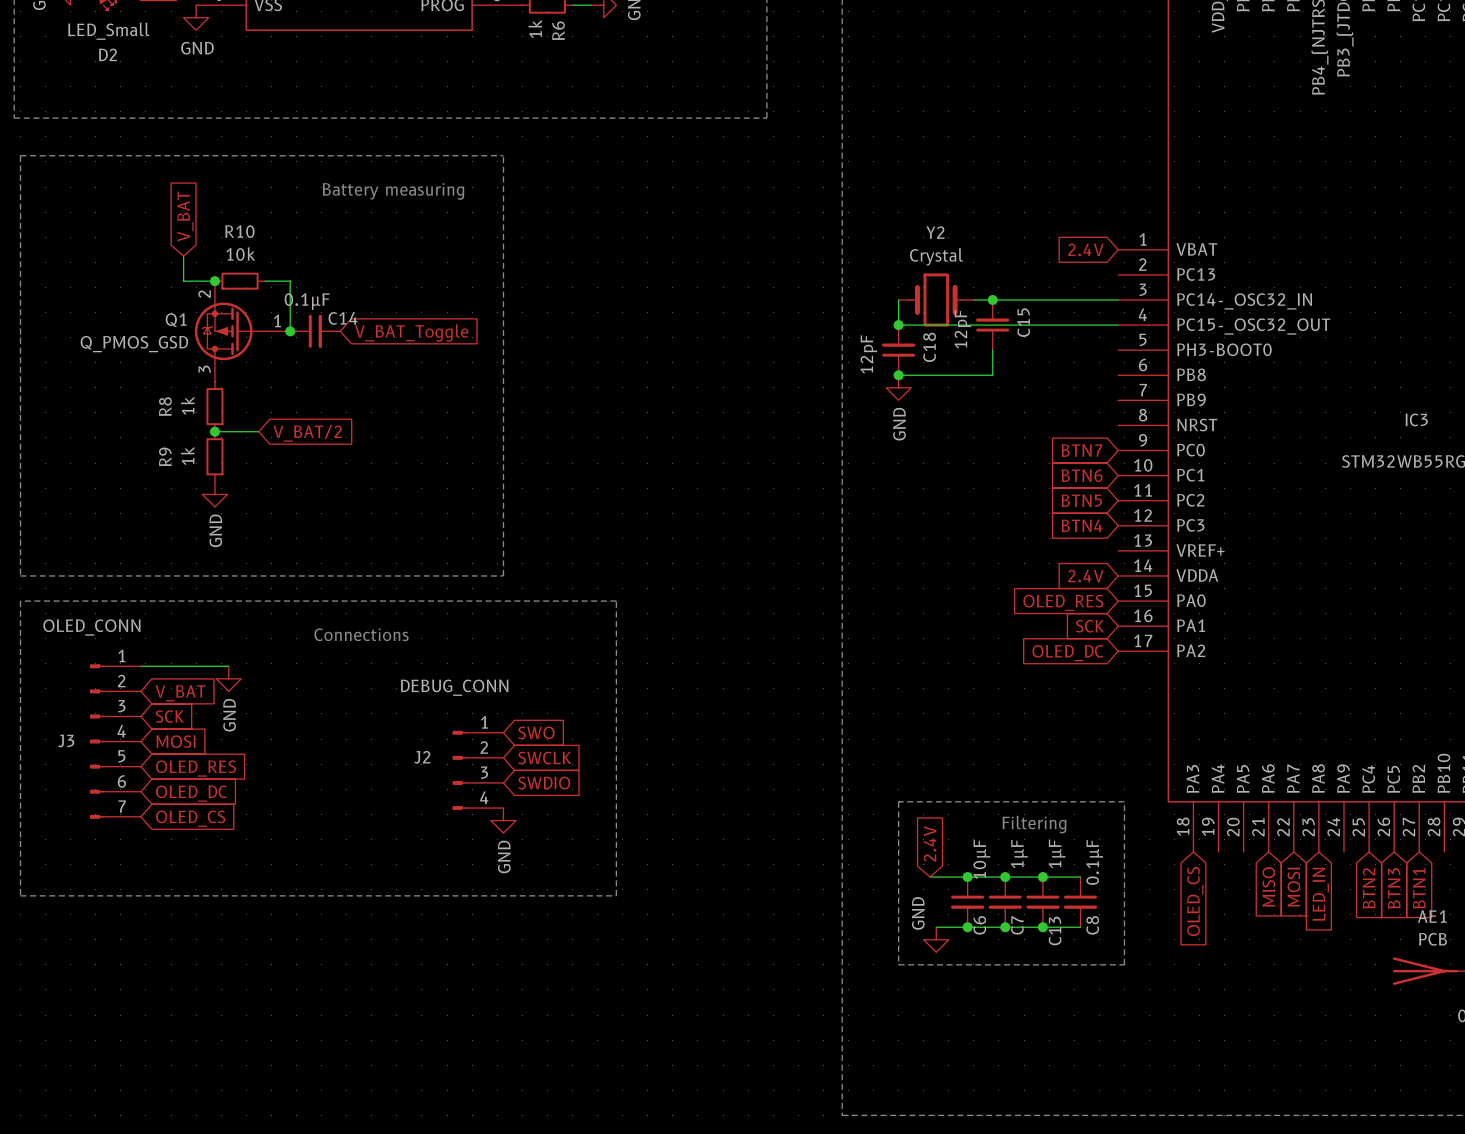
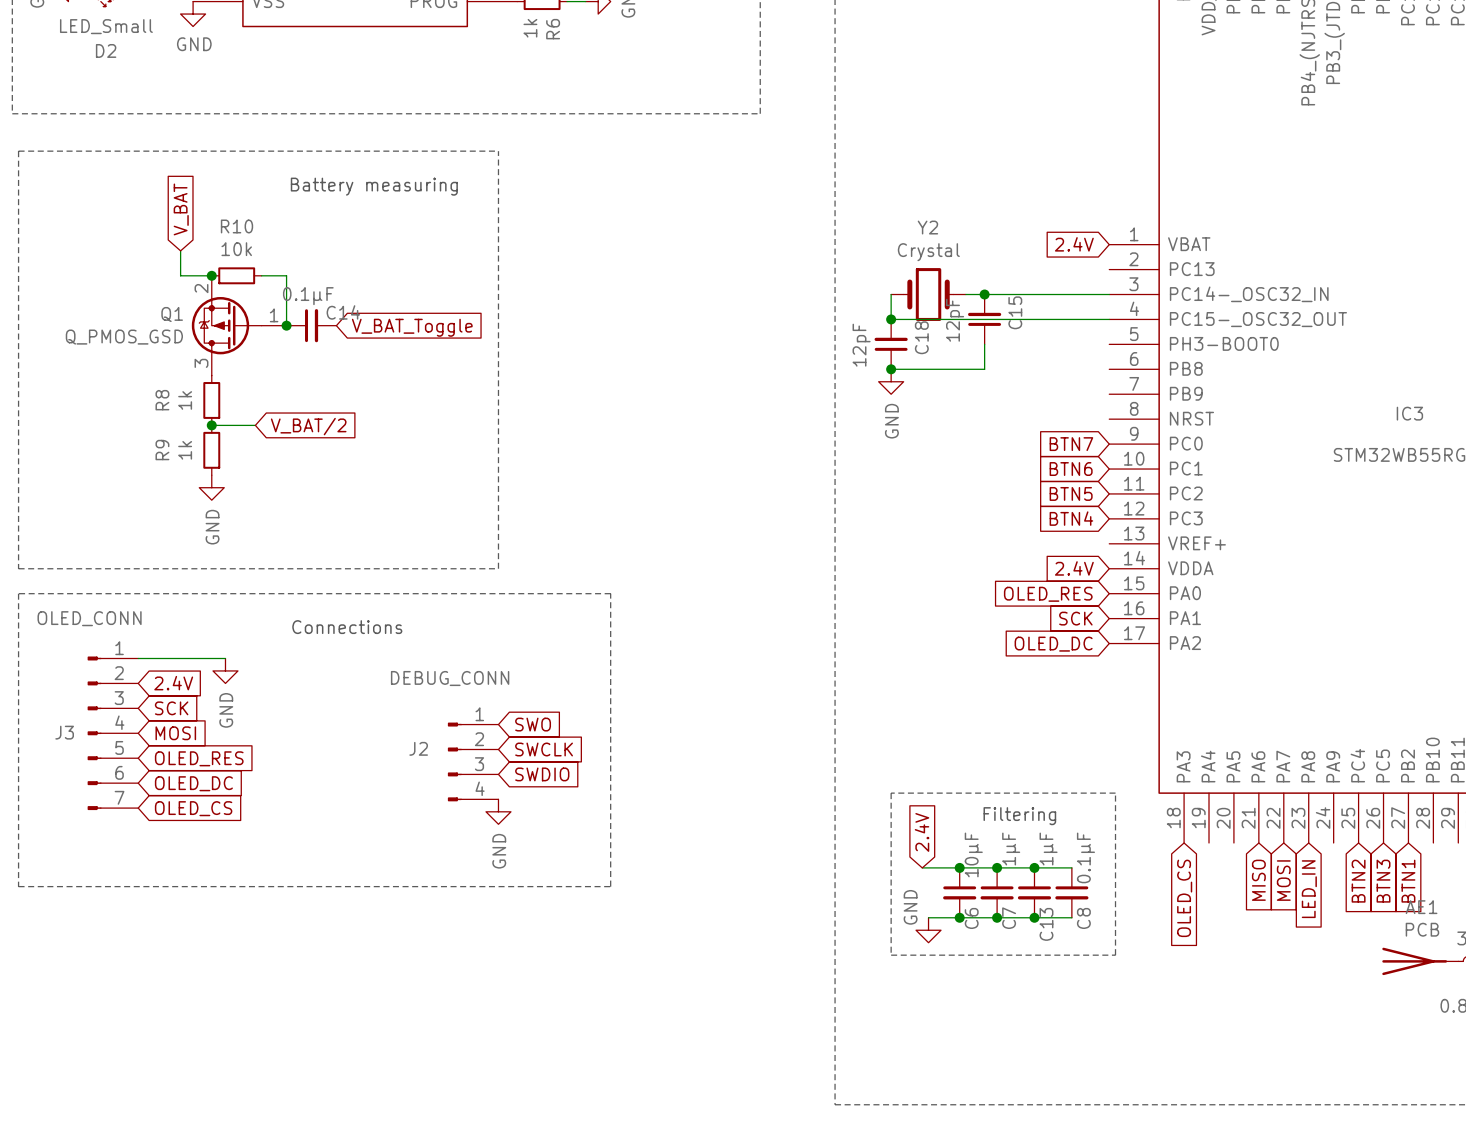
global label: V_BAT (180, 693) -> 2.4V (173, 683)

